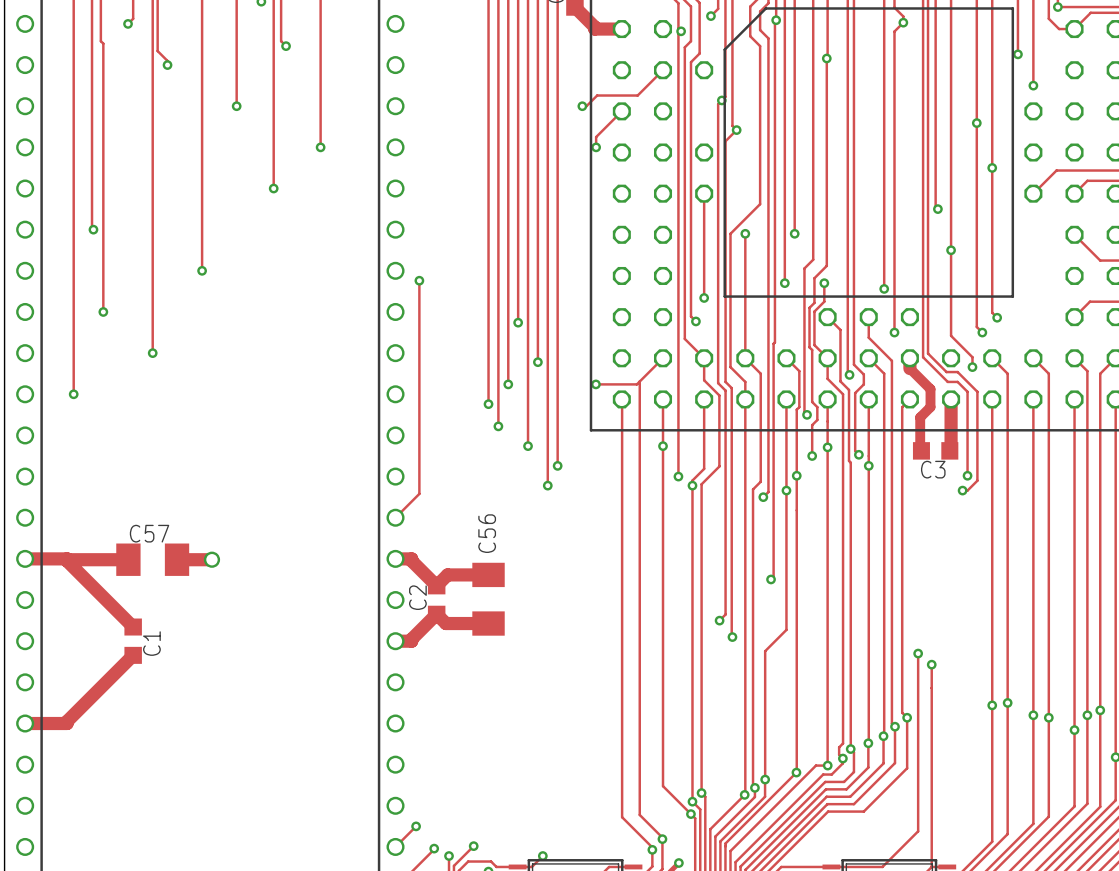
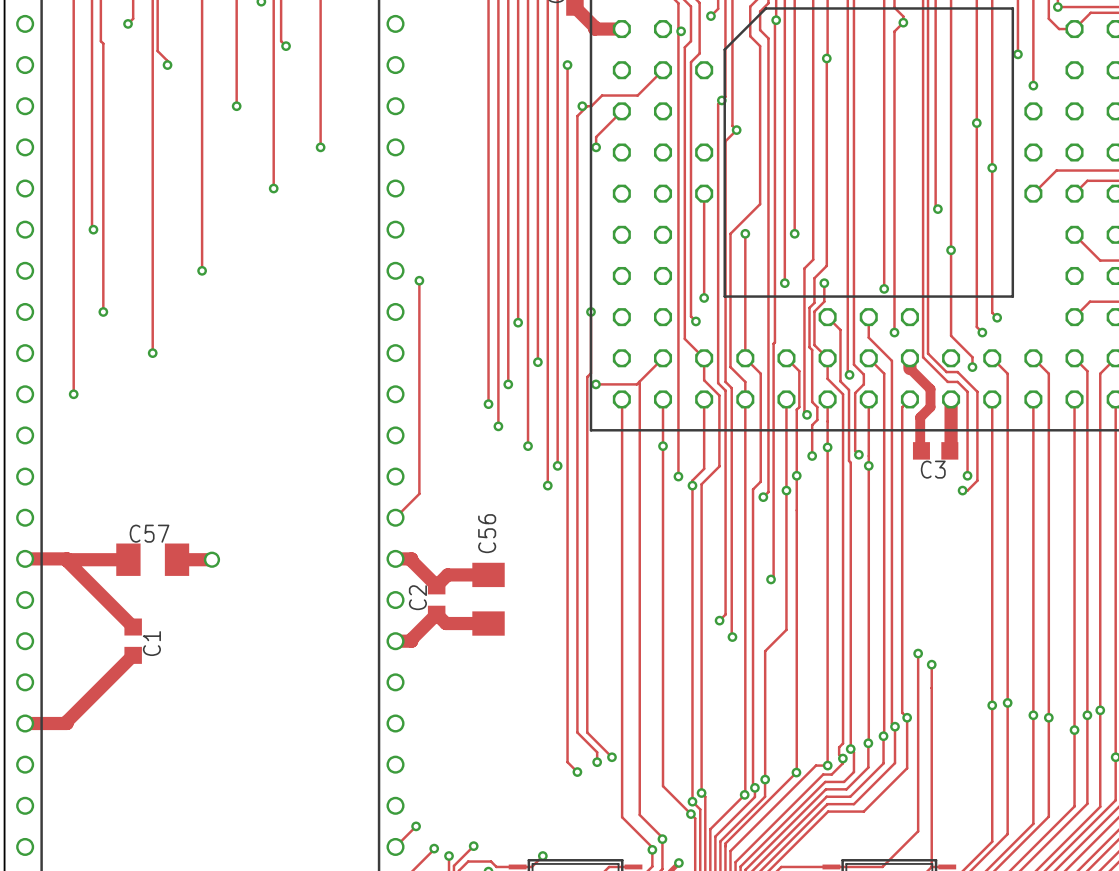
track: none -> (567, 65) (567, 762) (577, 772)
via: none -> (567, 65)
track: (602, 95) (597, 95) (586, 106) (582, 106) -> (602, 95) (577, 116) (577, 732) (597, 752) (597, 762)
track: none -> (590, 311) (590, 373) (587, 377) (587, 732) (611, 757)
via: none -> (590, 311)
via: none -> (611, 757)
via: none -> (597, 762)
via: none -> (577, 772)

